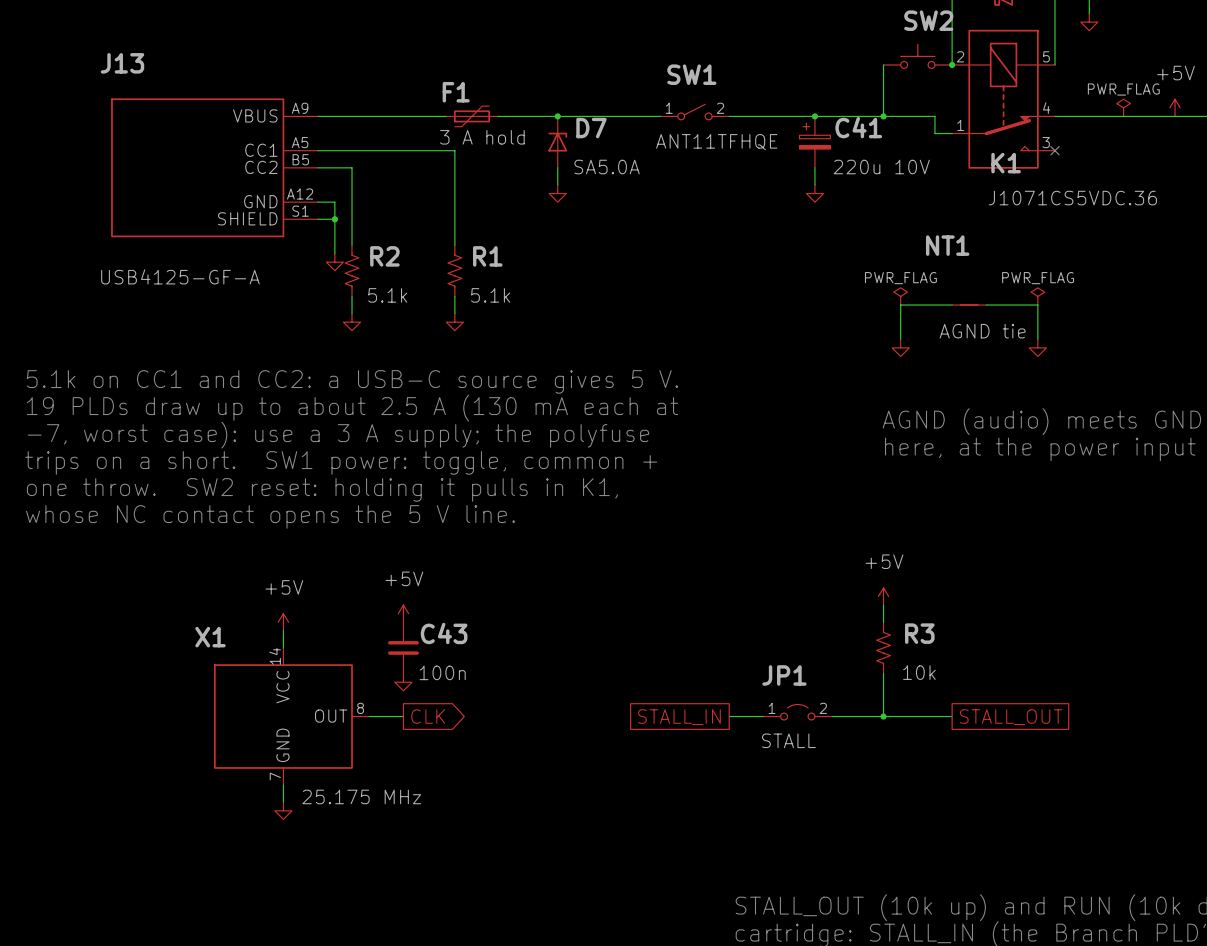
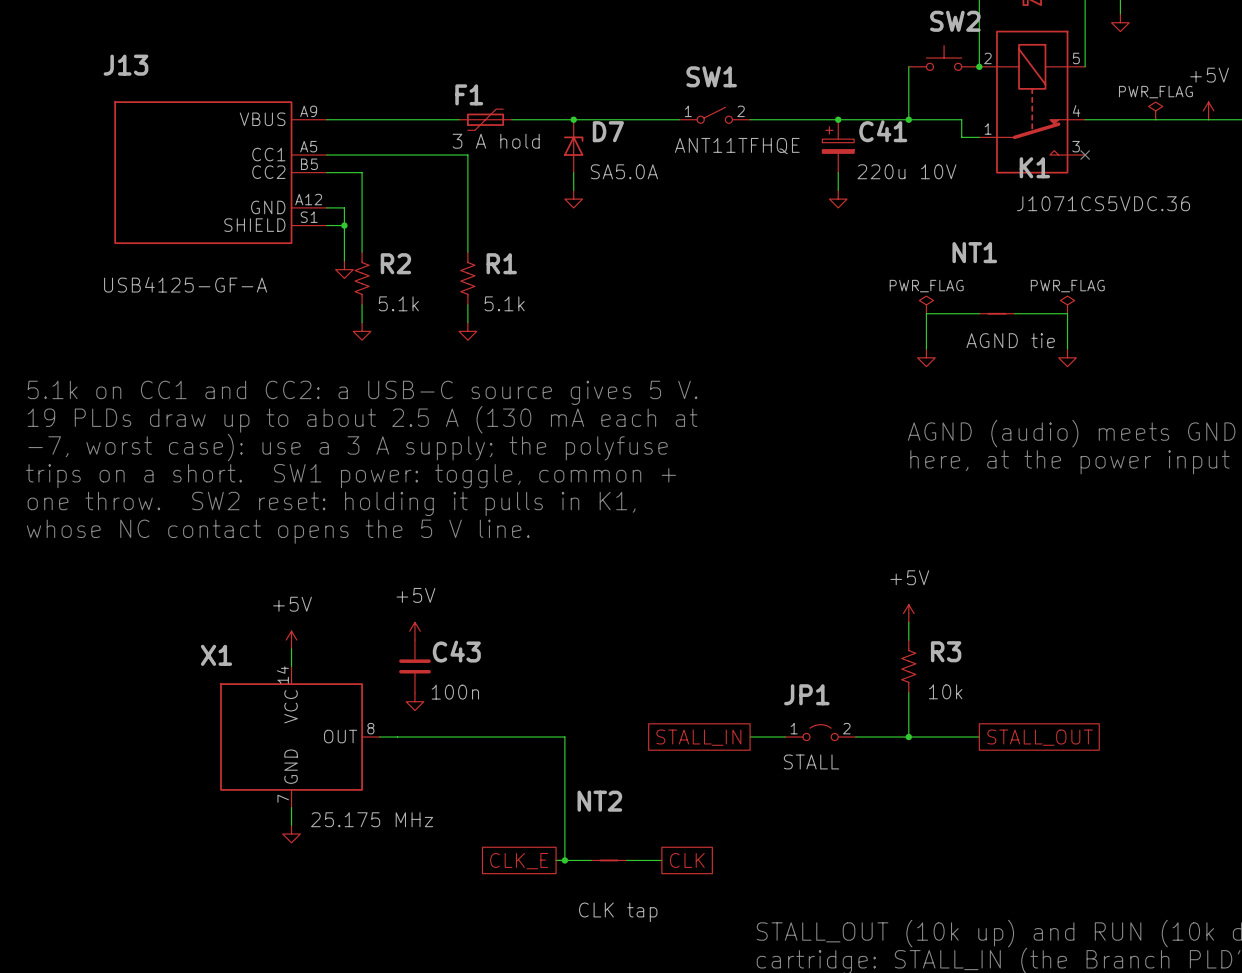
wire: none -> (414, 737) (564, 737) (564, 860)
global label: CLK (428, 716) -> none
wire: none -> (556, 860) (591, 860)
junction: none -> (564, 860)
NT2: none -> CLK tap (608, 860)
wire: none -> (626, 860) (661, 860)
global label: none -> CLK (687, 860)
global label: none -> CLK_E (519, 861)

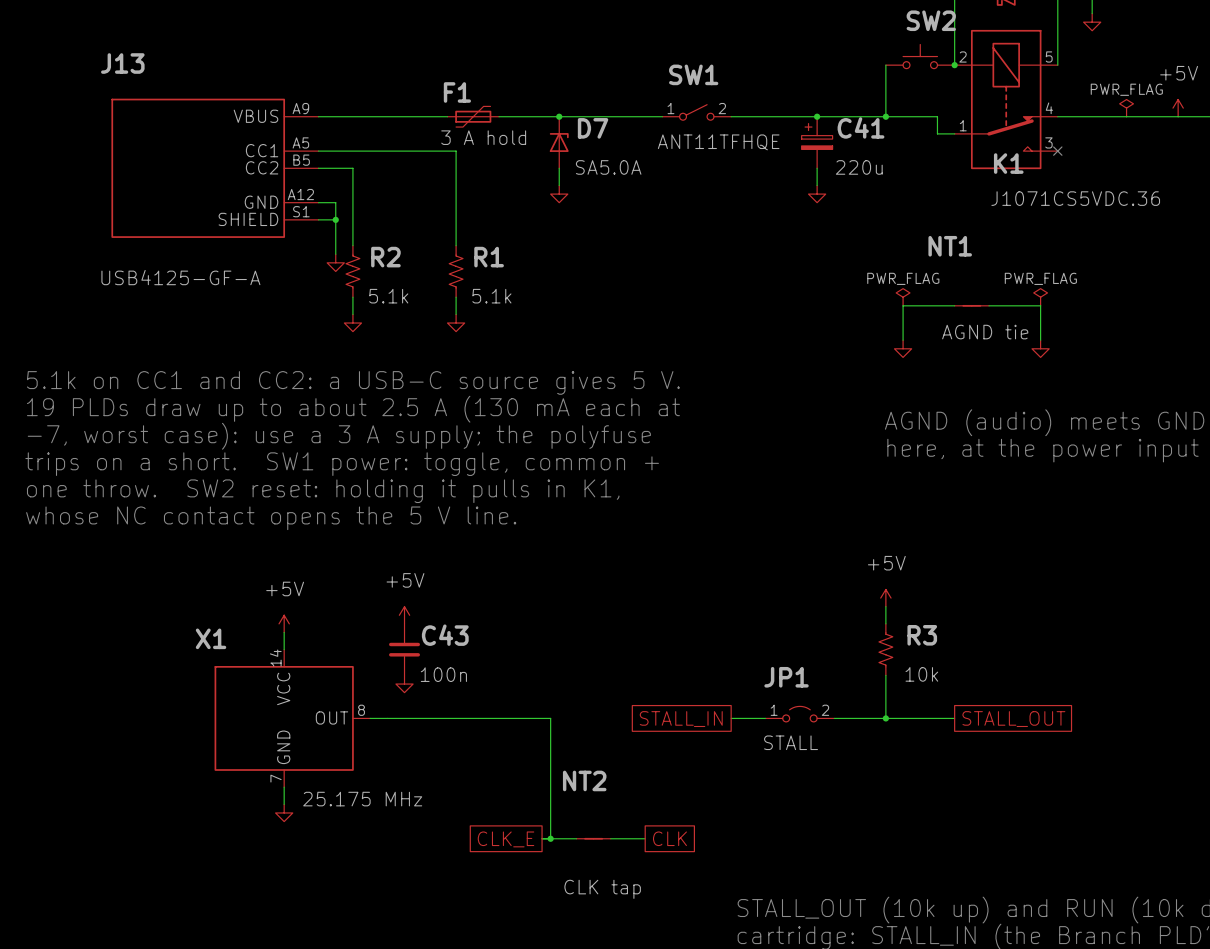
C41 value: 220u 10V (906, 171) -> 220u (859, 167)

